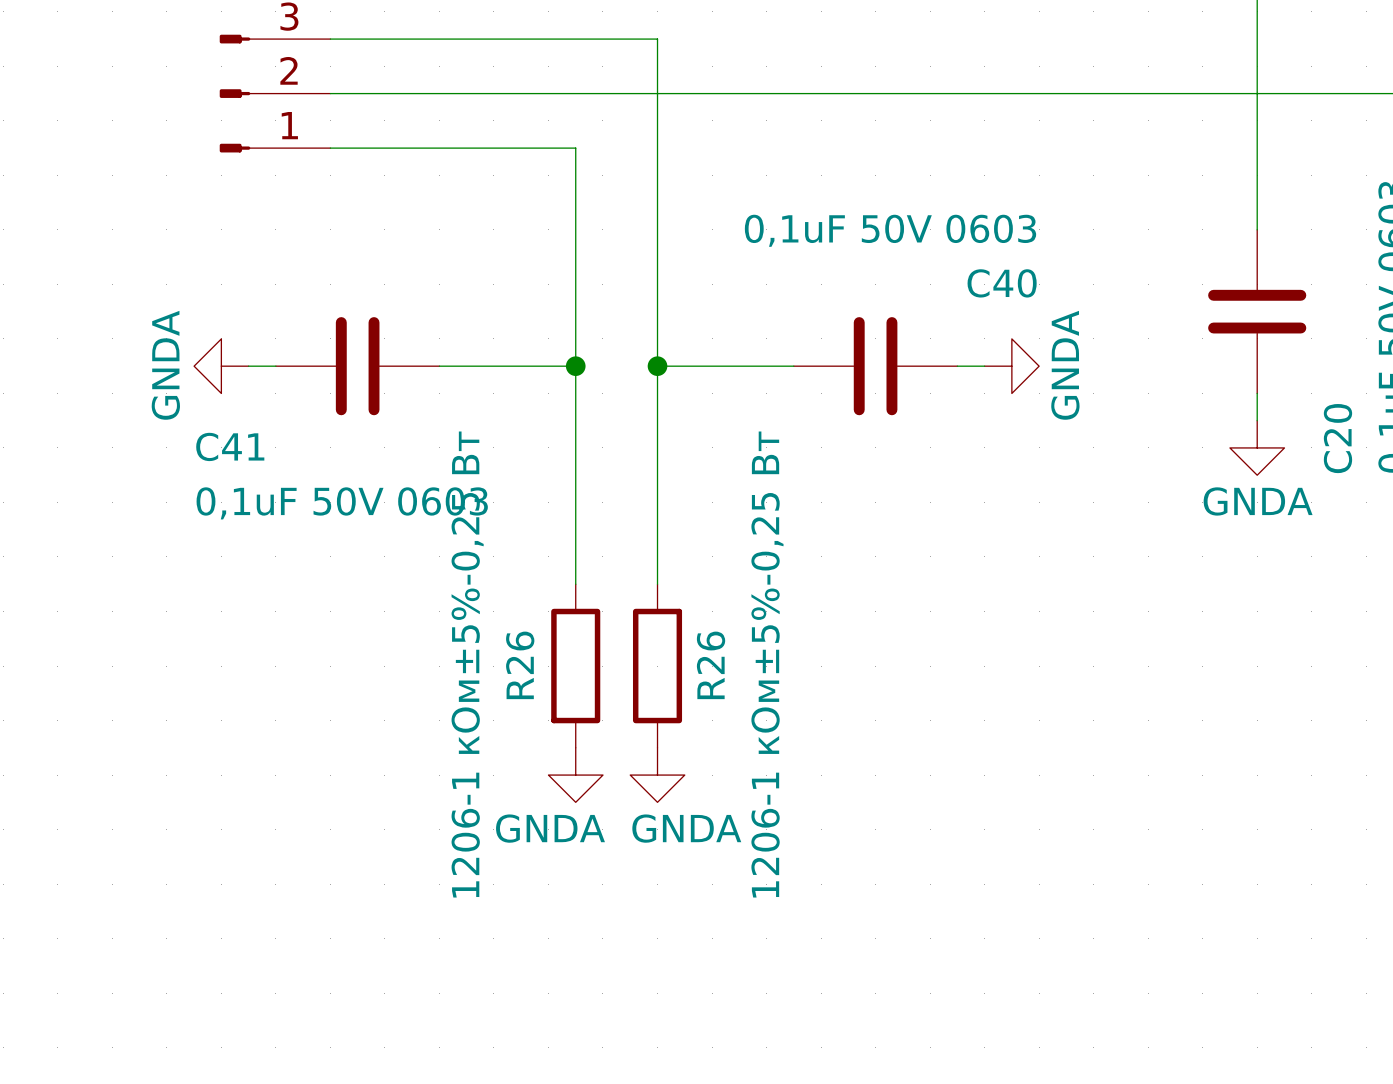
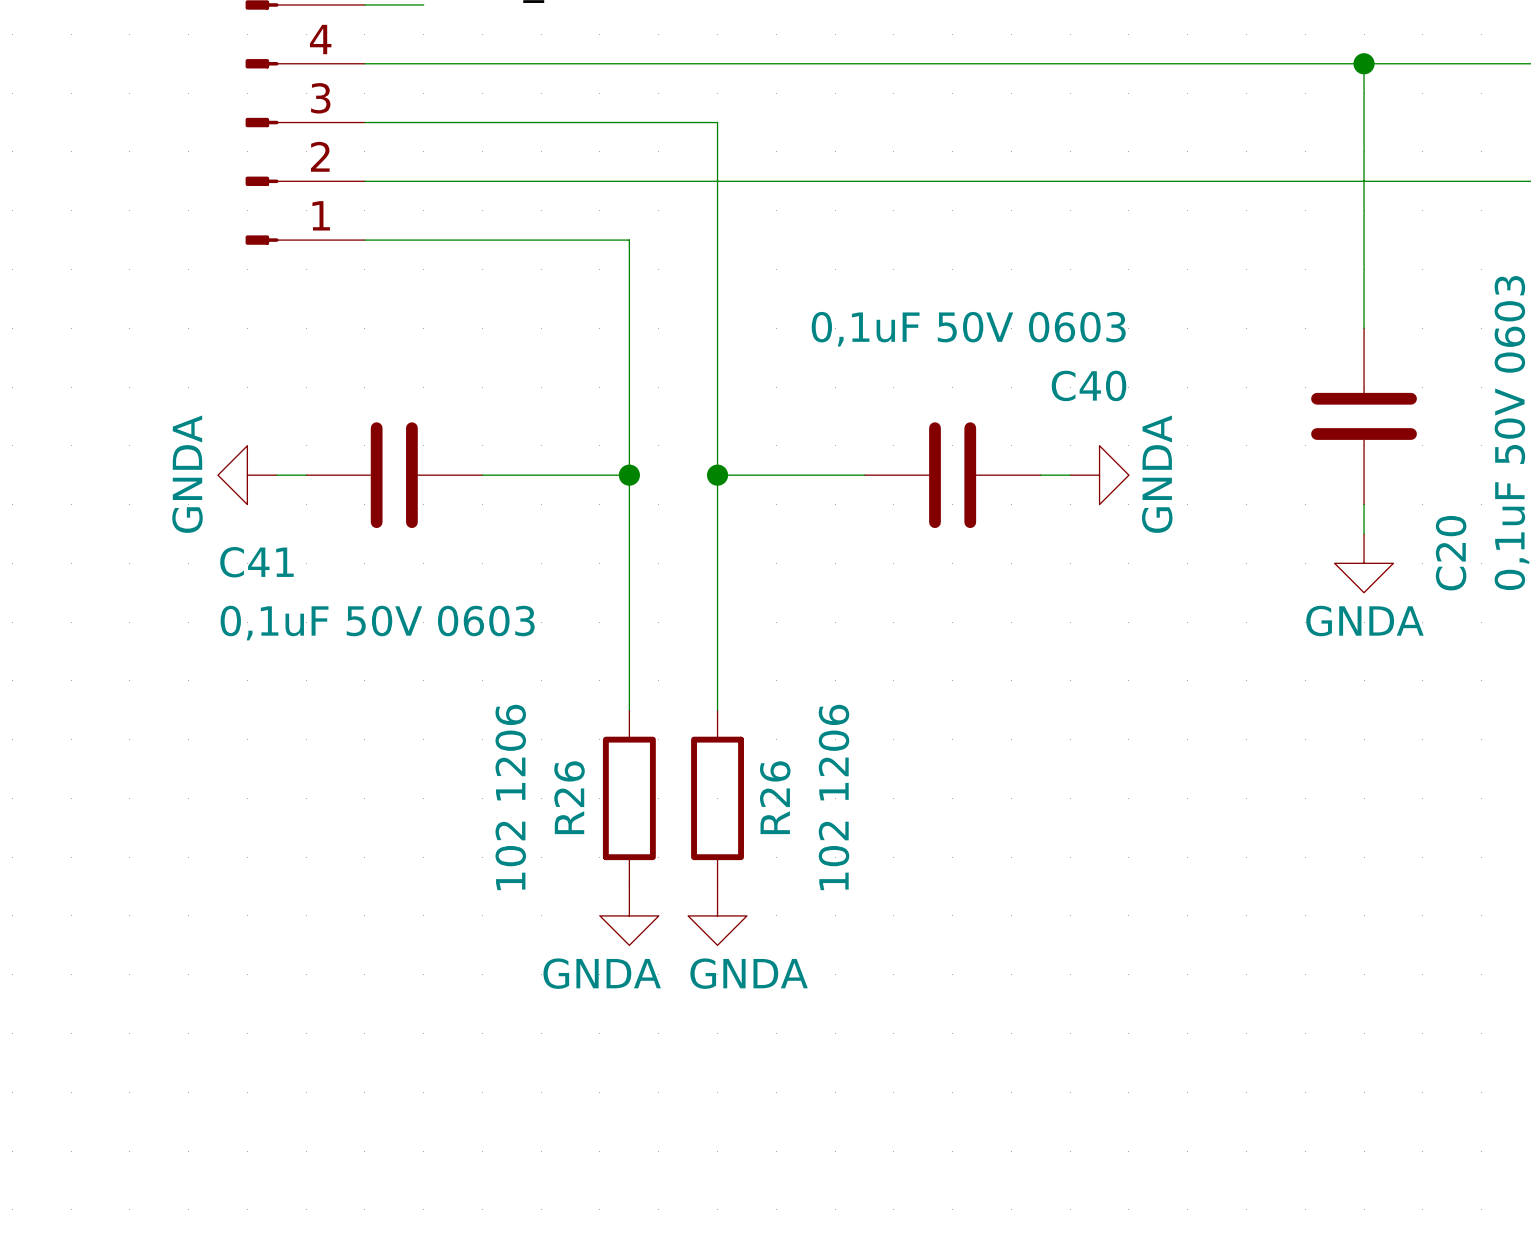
R26 value: 1206-1 кОм±5%-0,25 Вт (467, 664) -> 102 1206 (510, 797)
R26 value: 1206-1 кОм±5%-0,25 Вт (767, 664) -> 102 1206 (834, 797)

